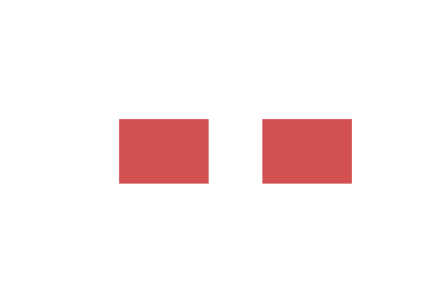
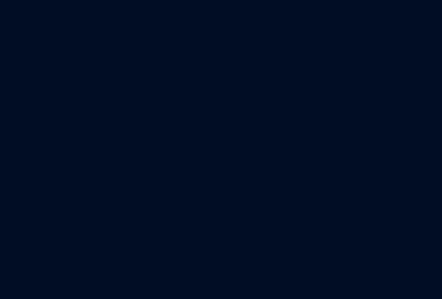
part: (235, 151) -> none

